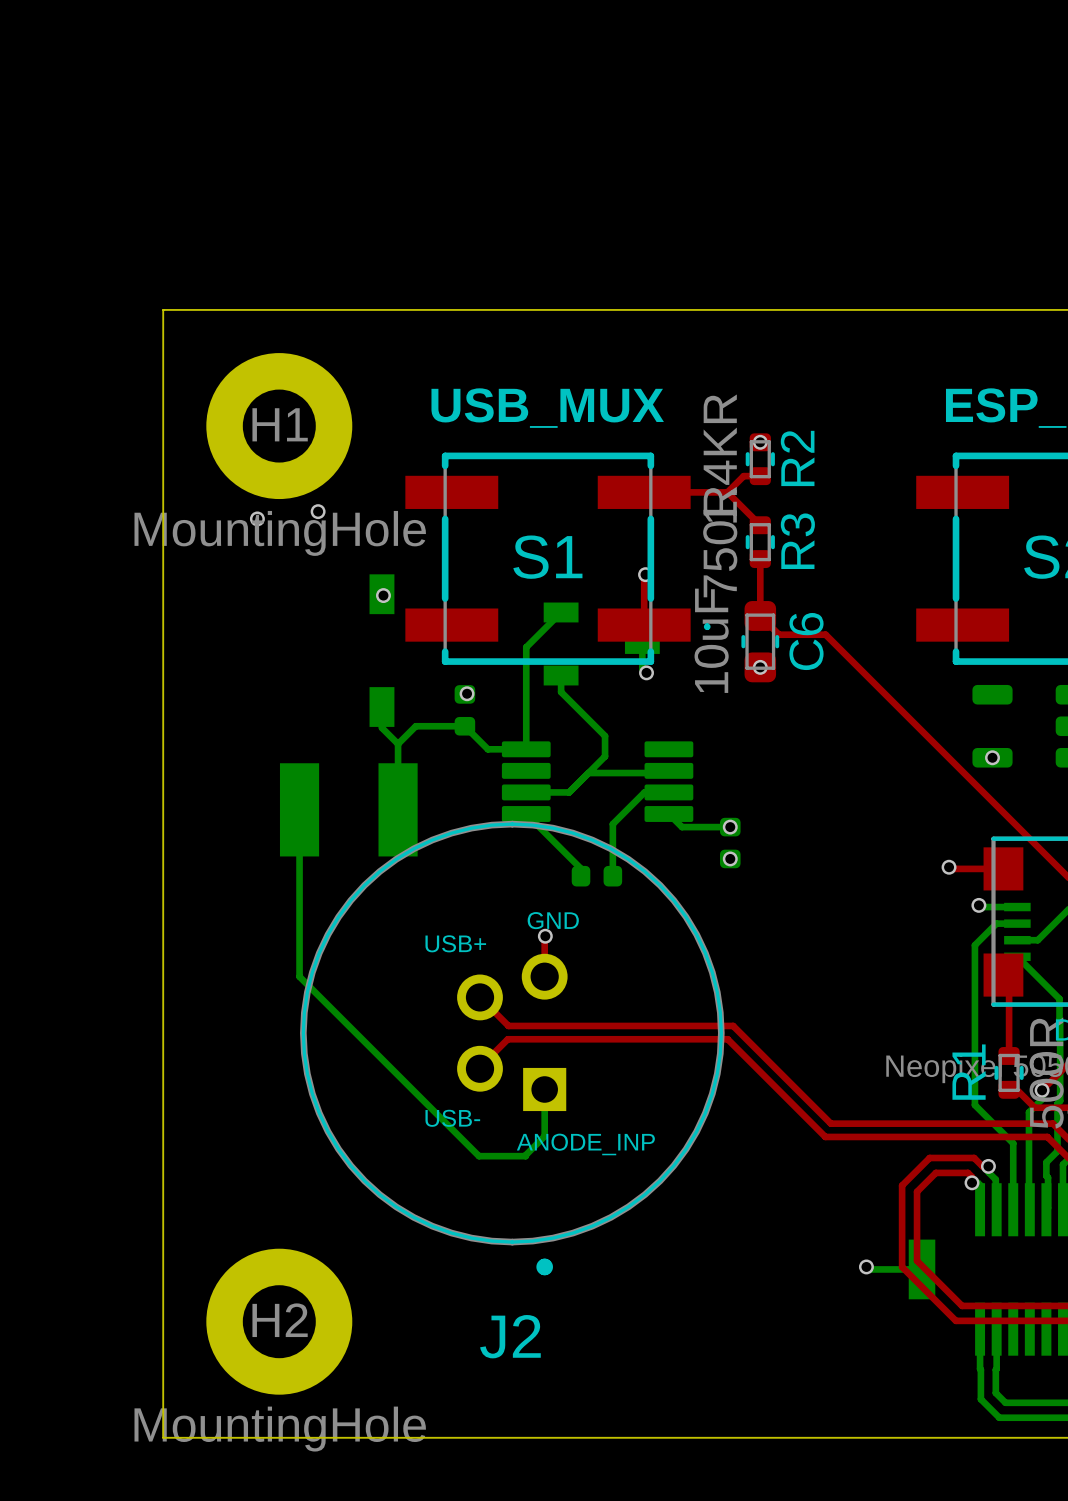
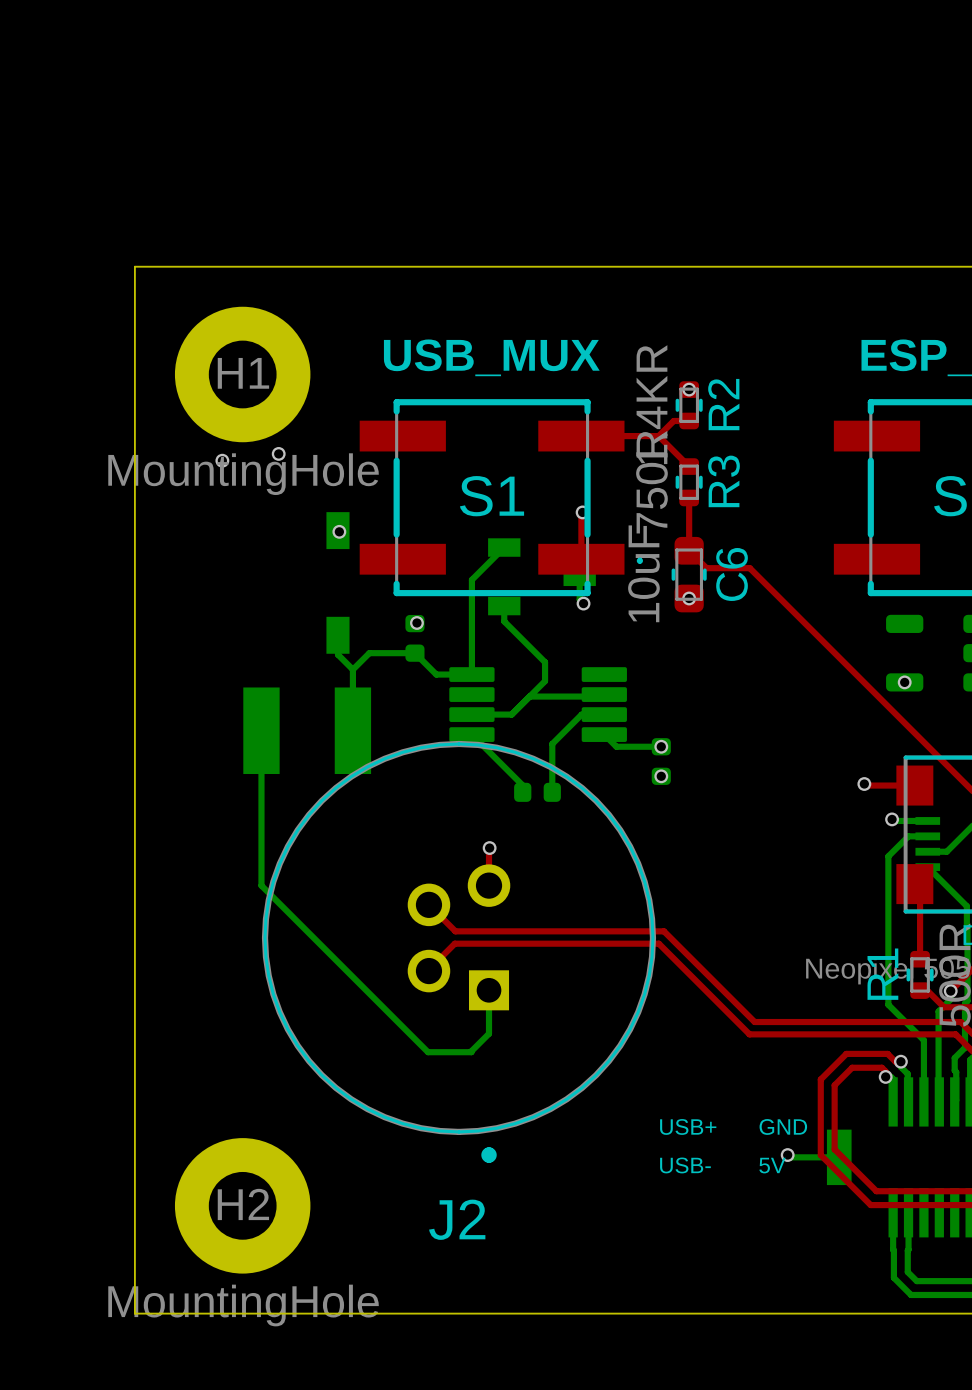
text position: GND (553, 920) -> GND (783, 1126)
text position: USB+ (455, 943) -> USB+ (688, 1126)
text position: USB- (452, 1118) -> USB- (685, 1165)
text: ANODE_INP (585, 1144) -> none
text: none -> 5V (772, 1165)

